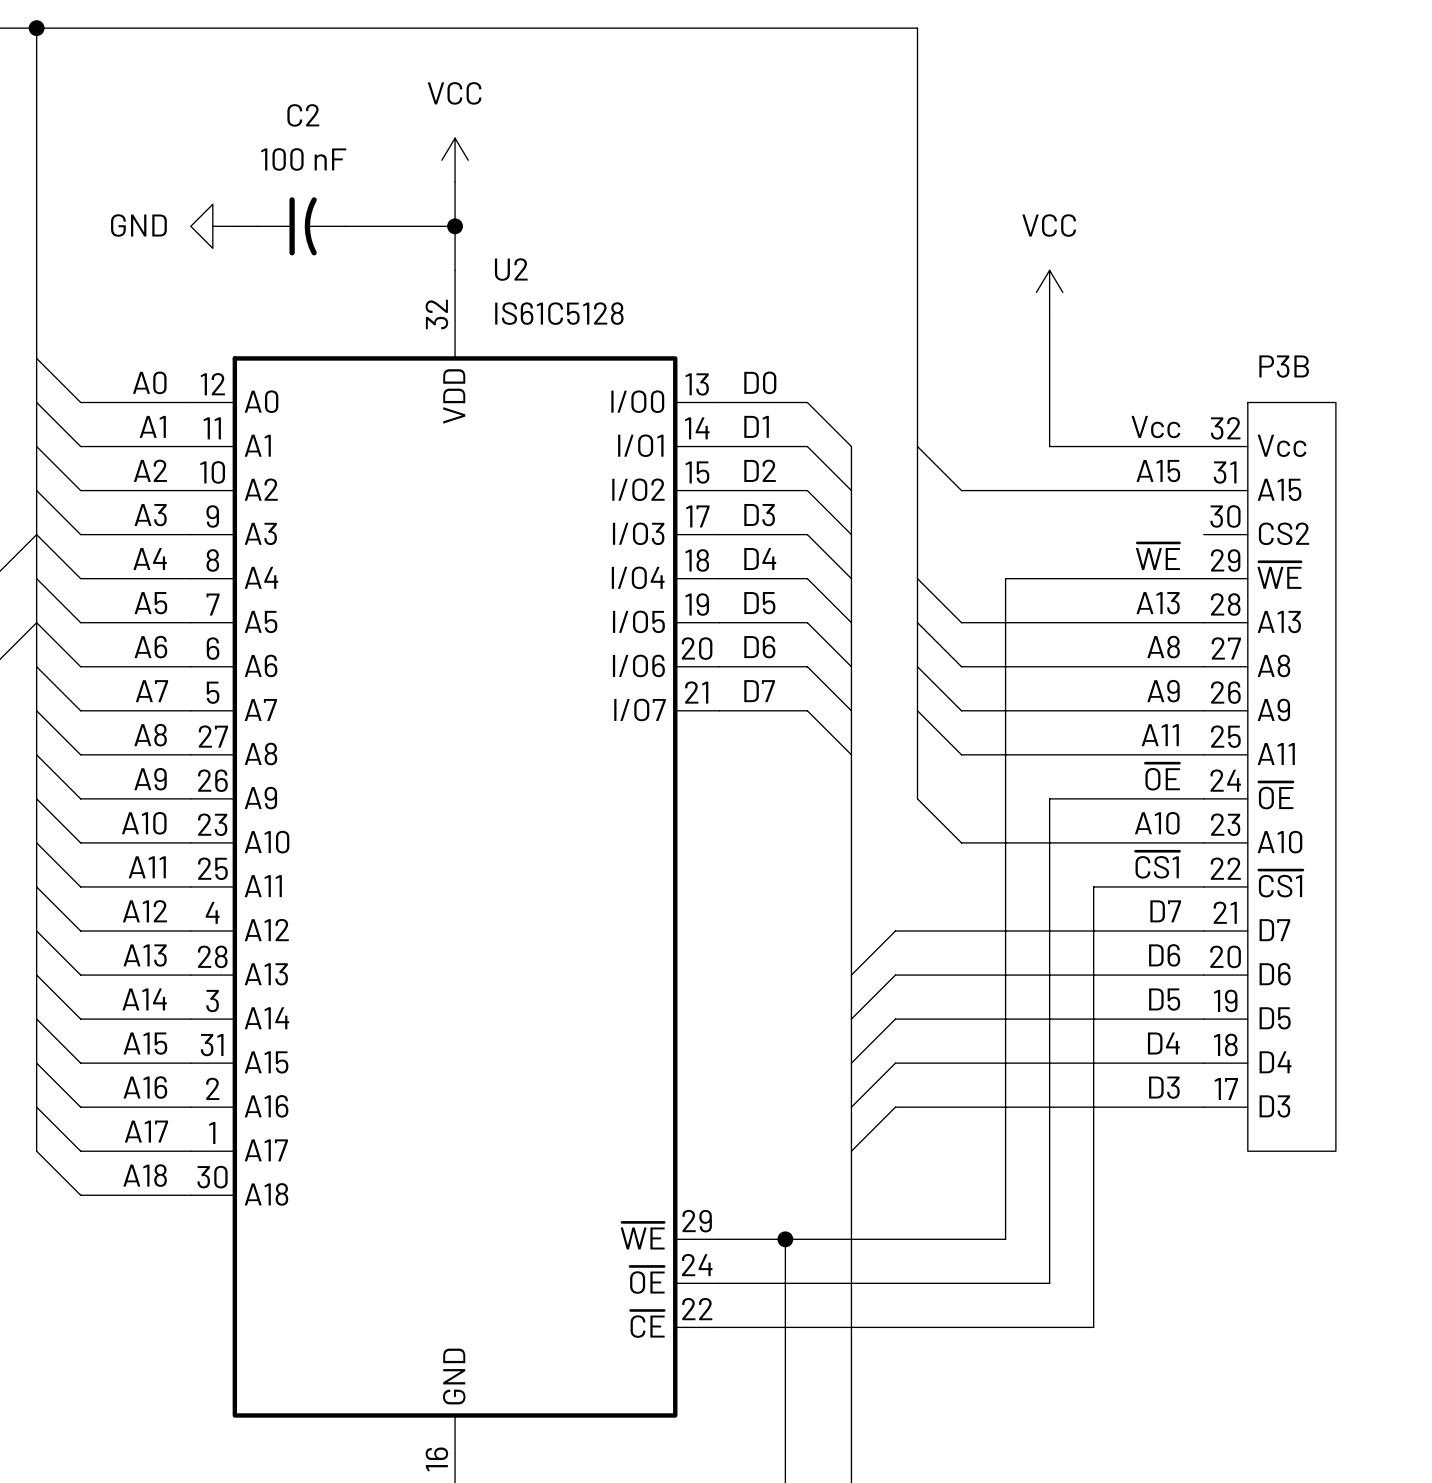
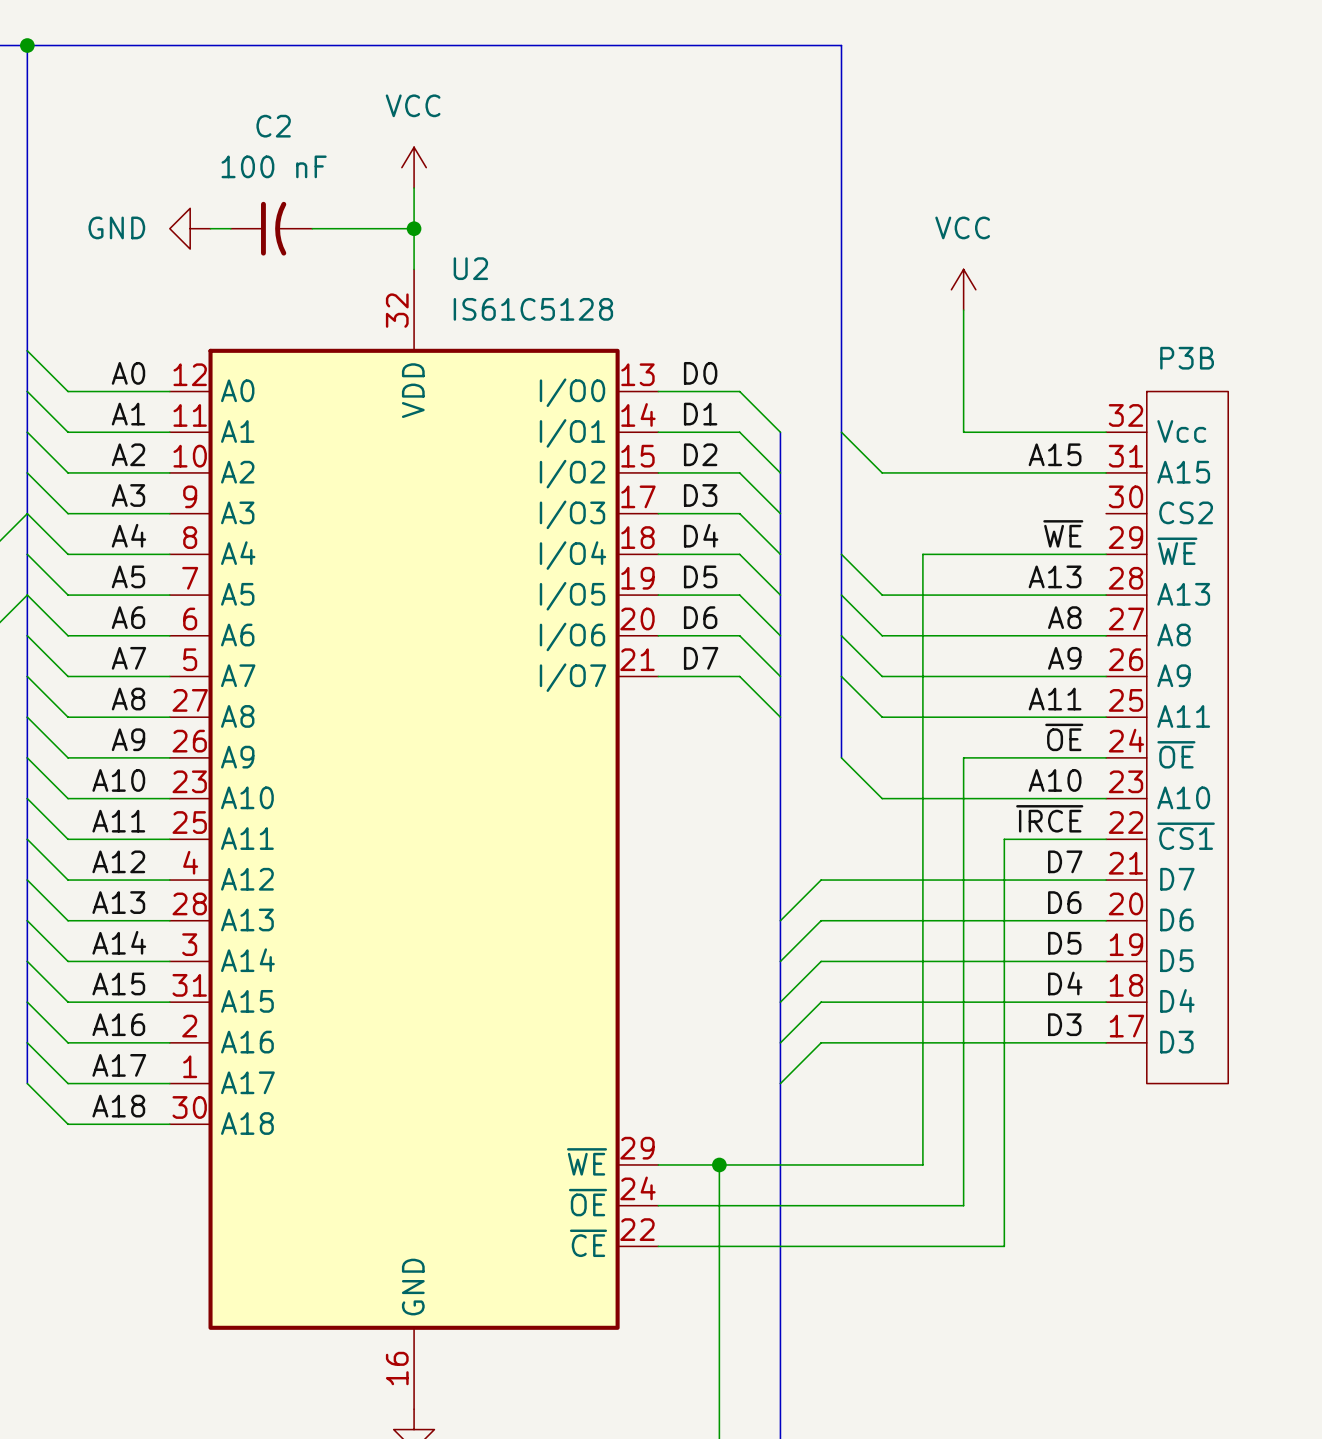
label: Vcc (1155, 427) -> none
label: ~{CS1} (1157, 864) -> ~{IRCE} (1049, 818)

